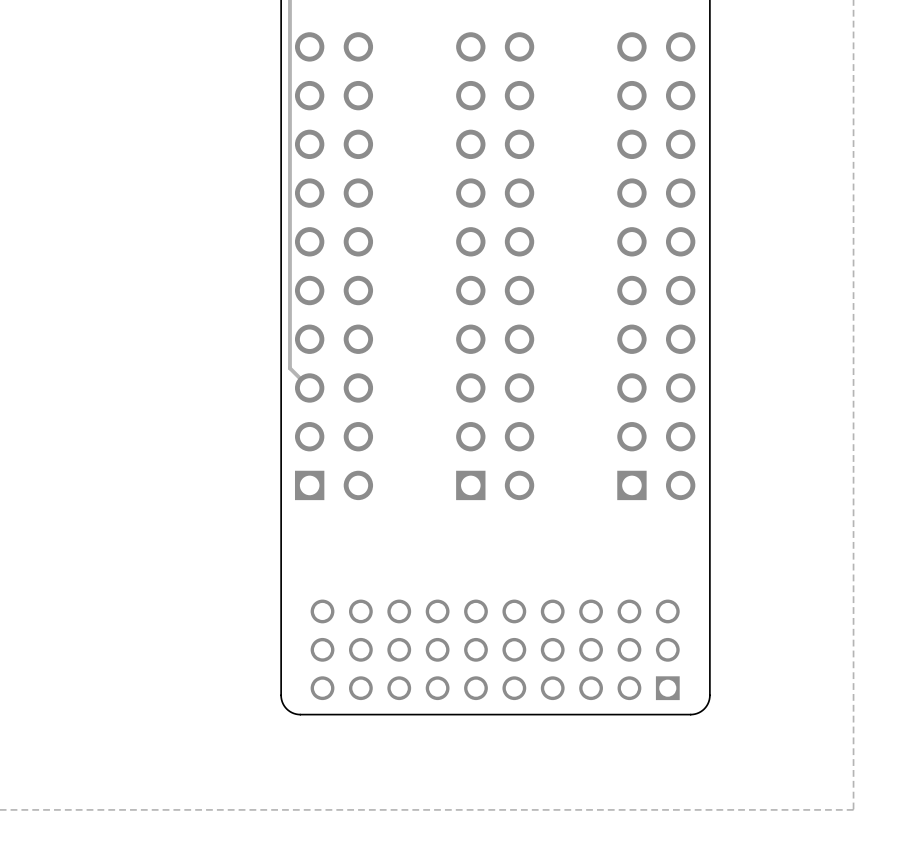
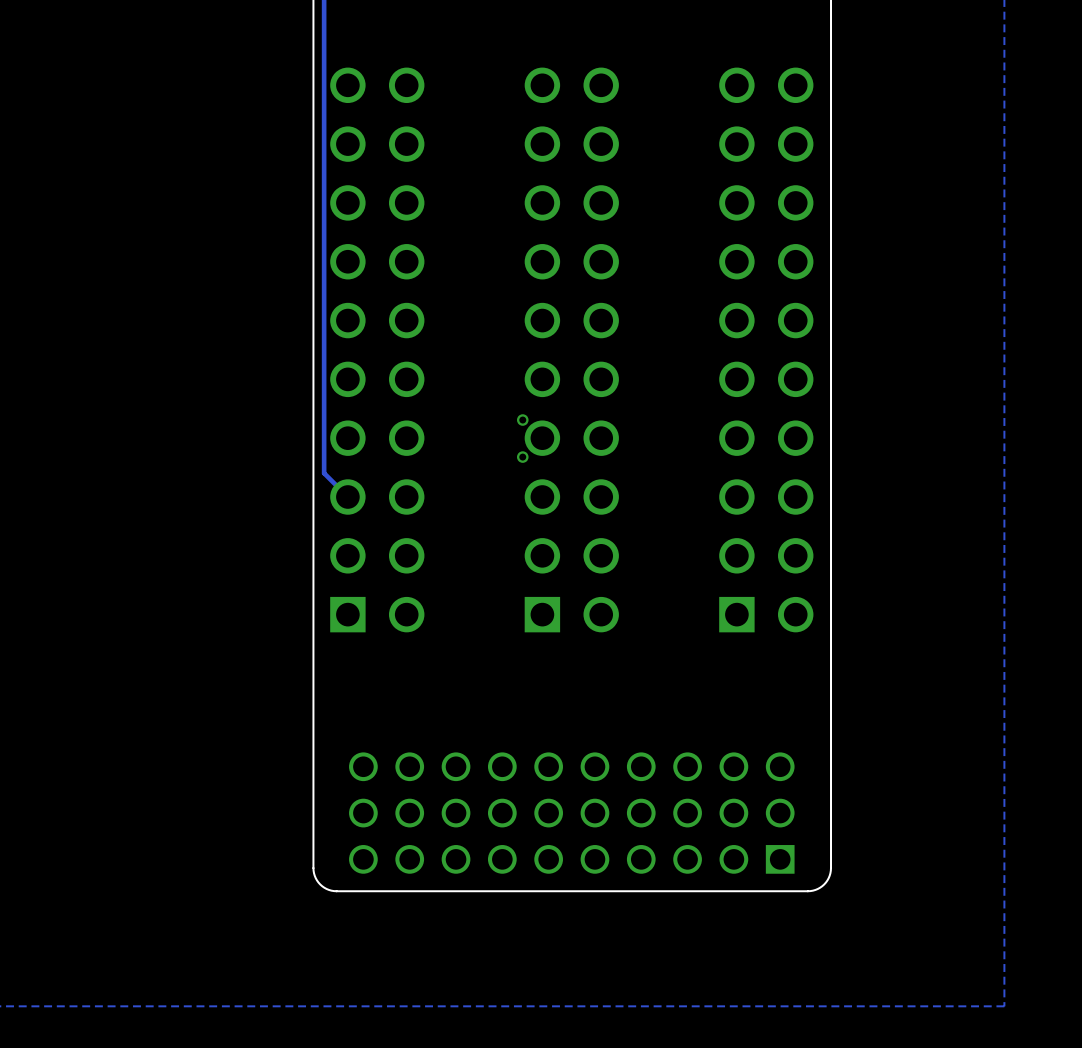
via: none -> (522, 420)
via: none -> (522, 457)

